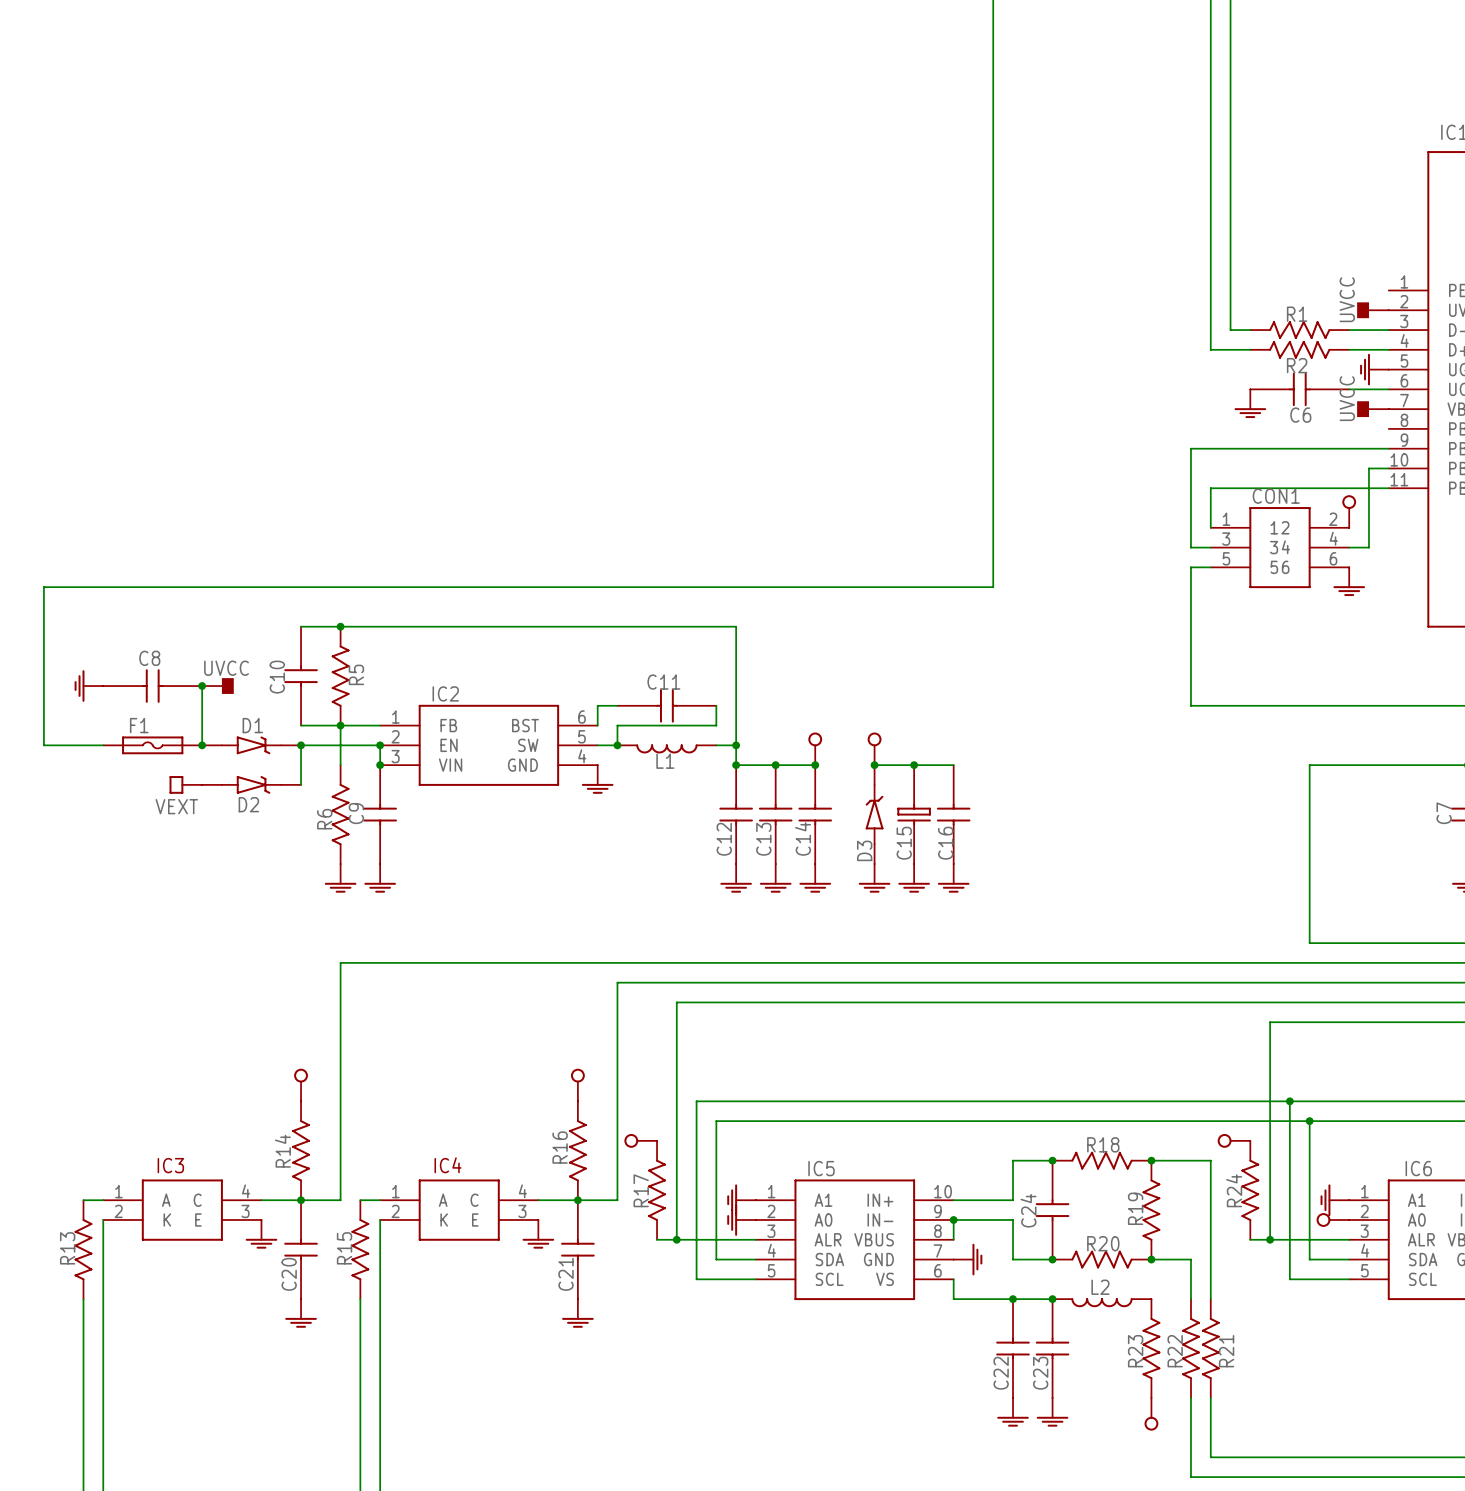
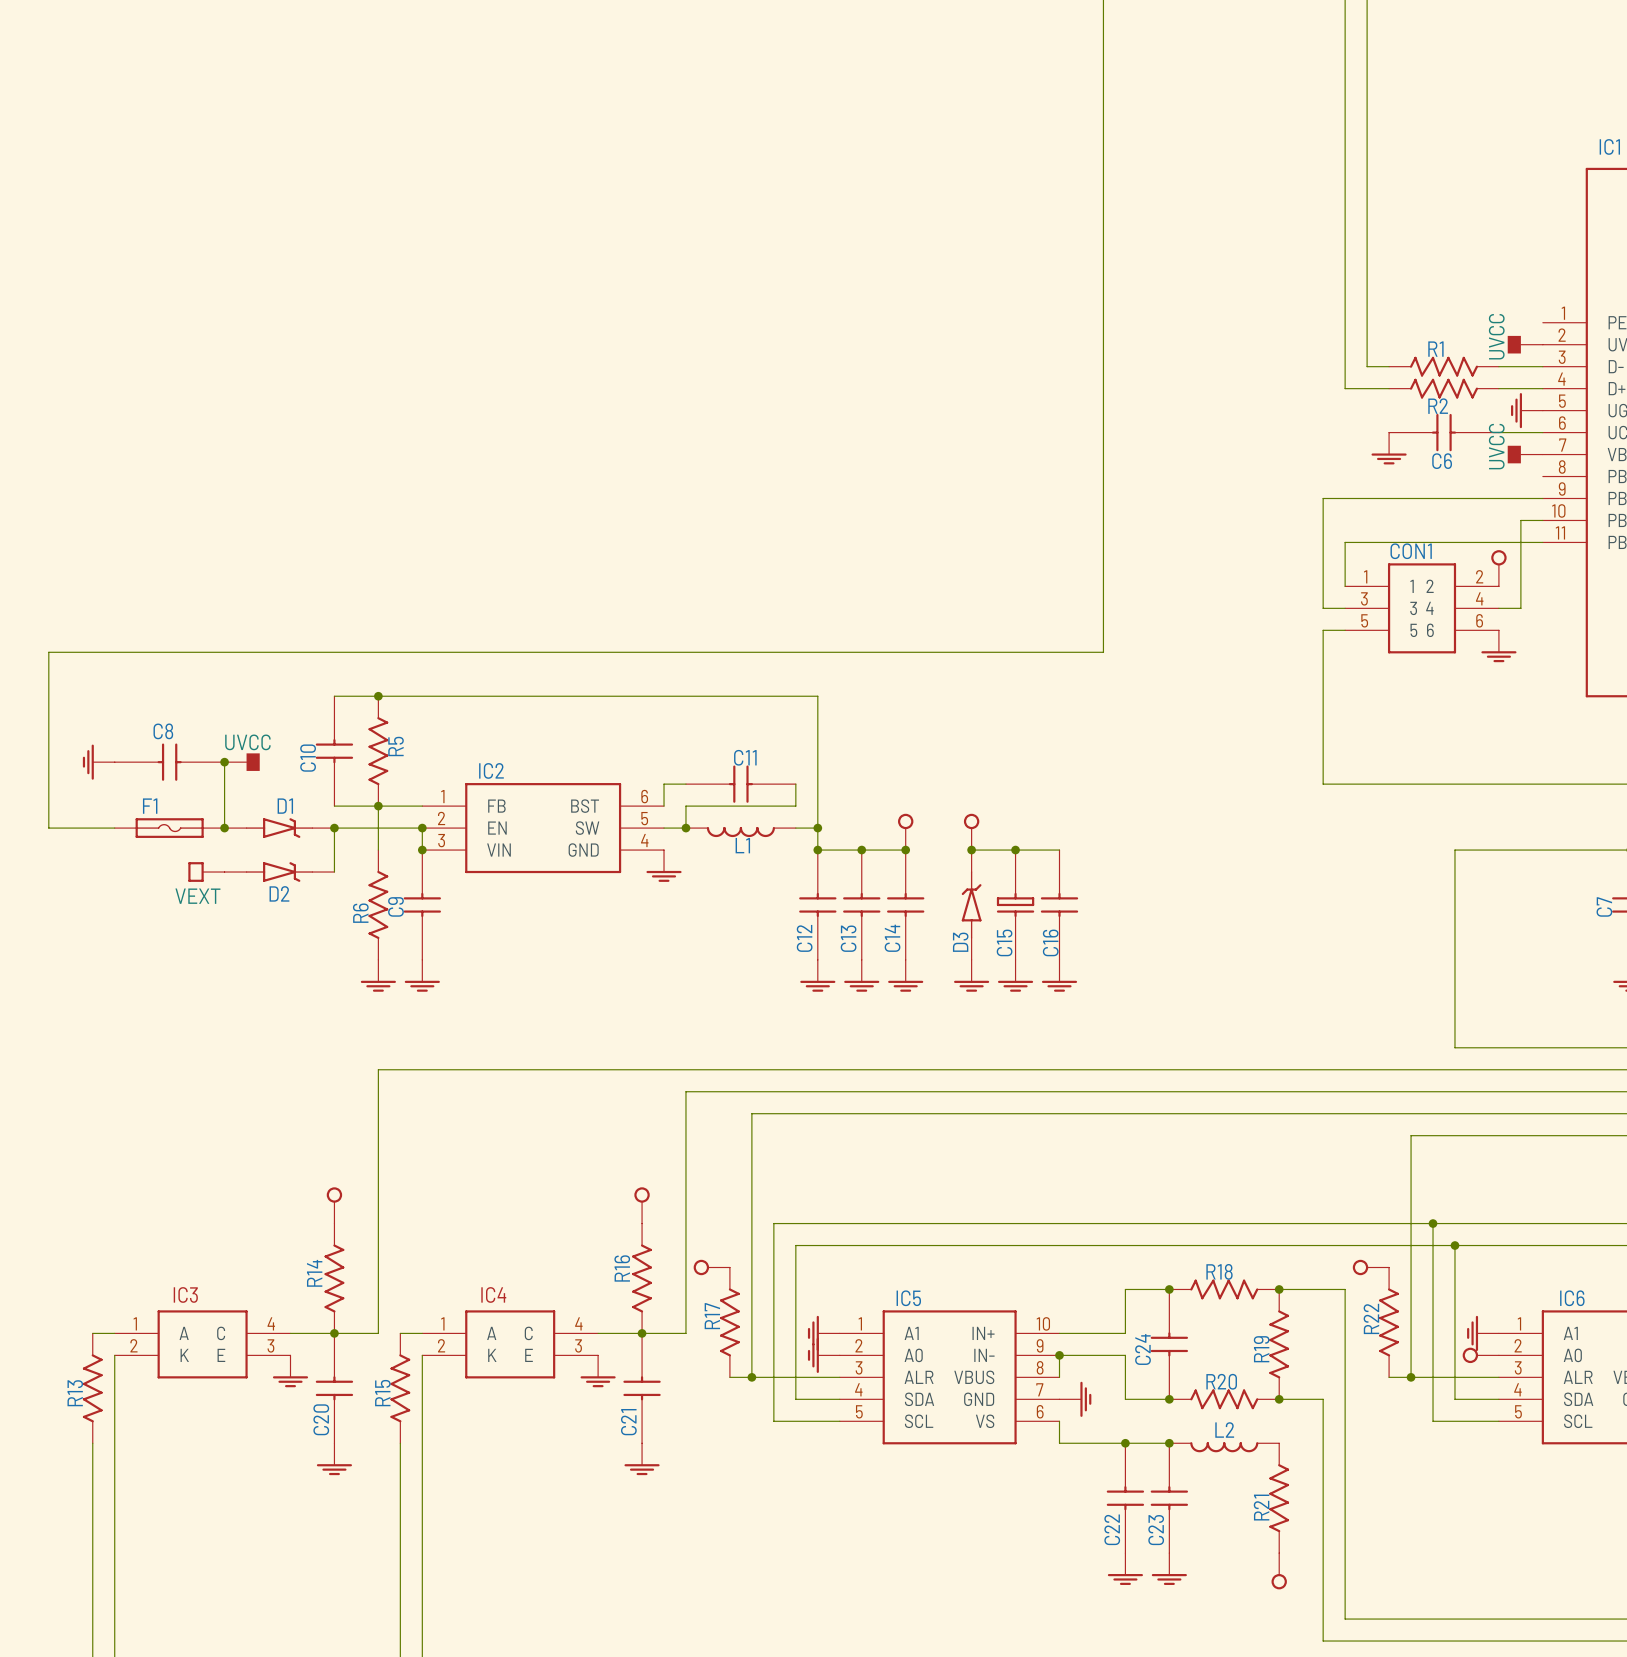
R24 name: R24 (1234, 1190) -> R22 (1371, 1318)
R22: (1190, 1348) -> none
R21: (1210, 1348) -> none
R23 name: R23 (1135, 1351) -> R21 (1261, 1507)

